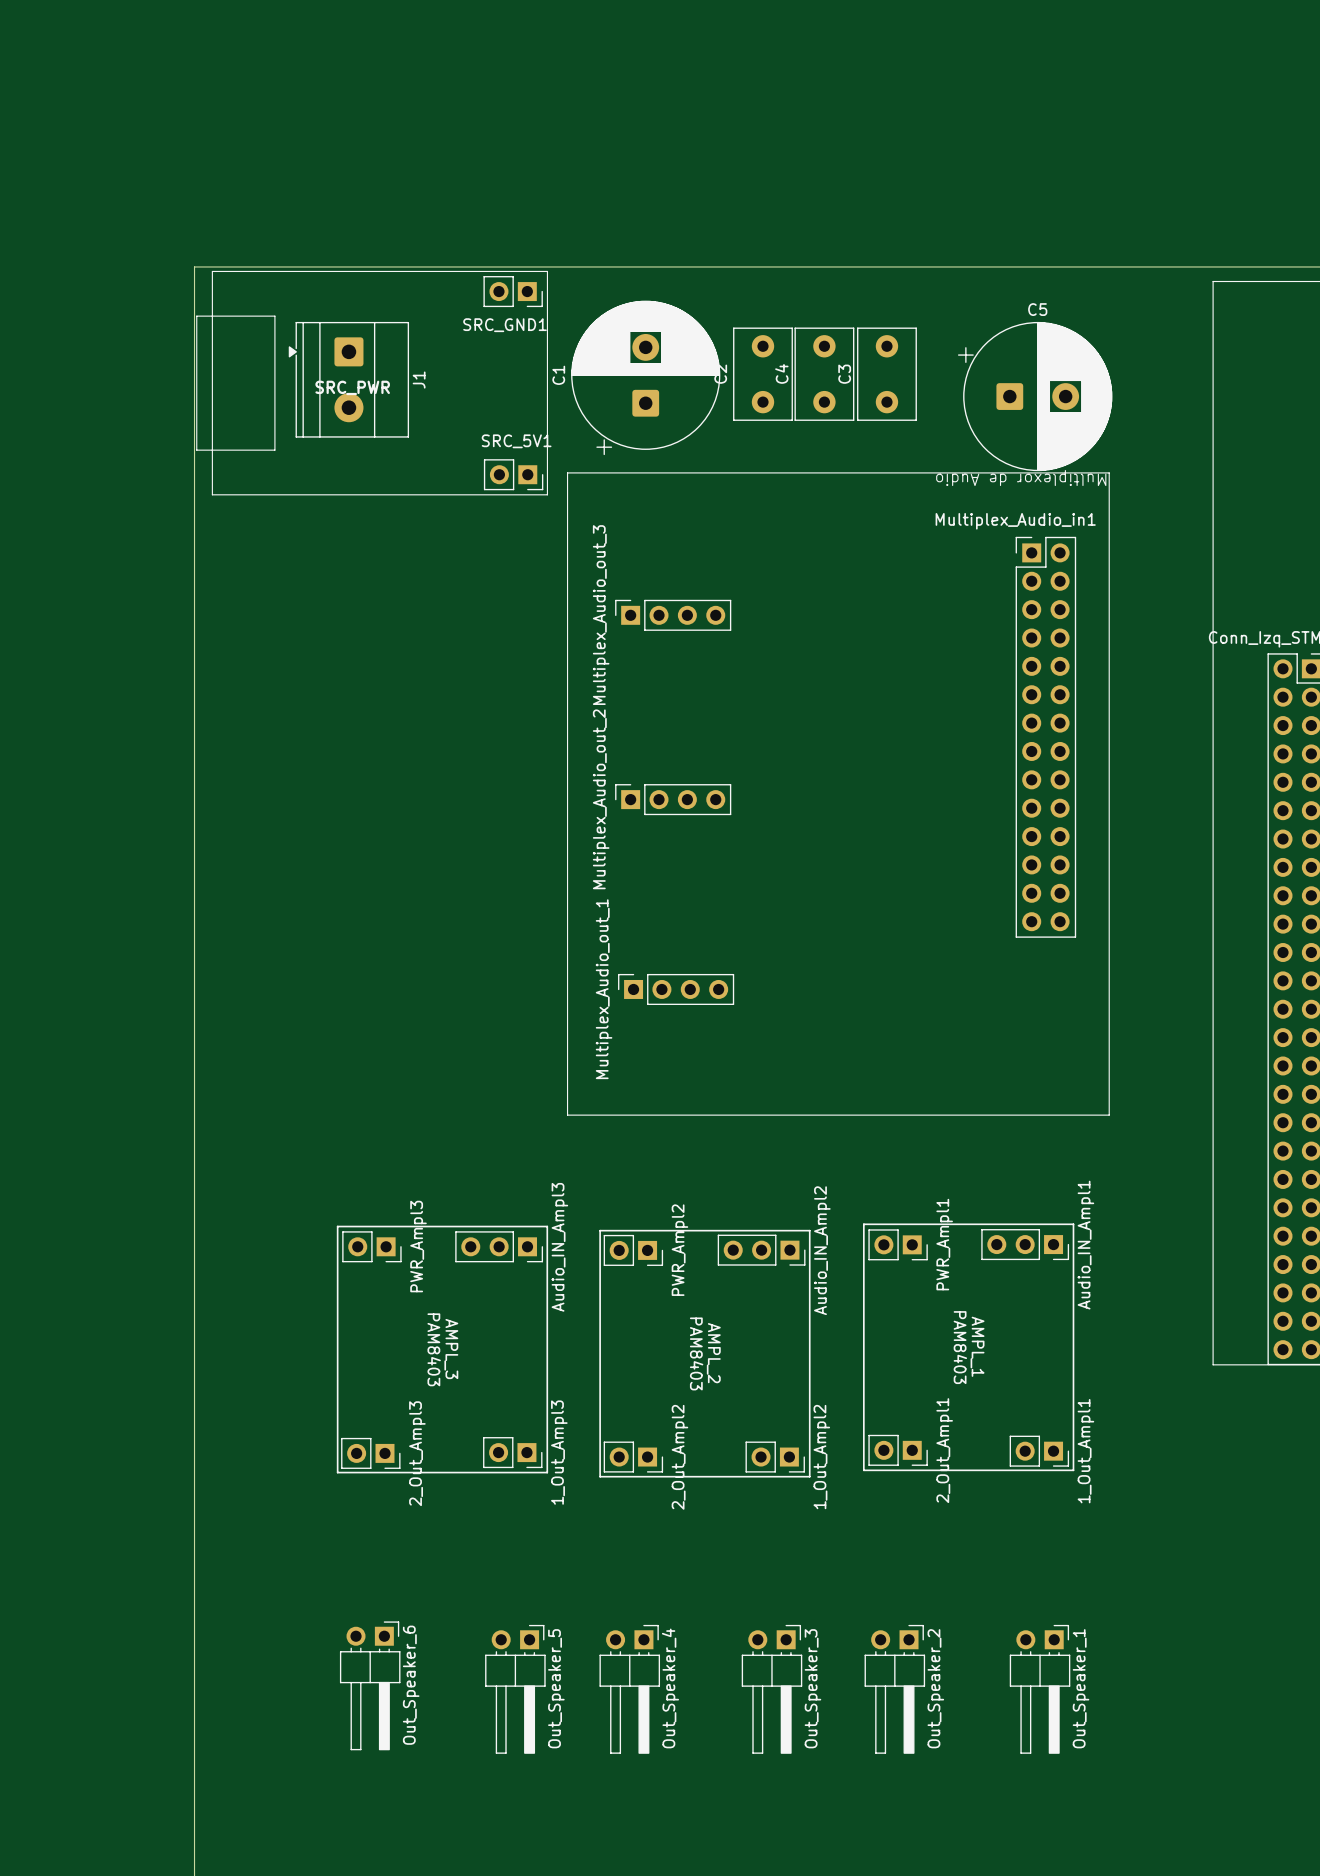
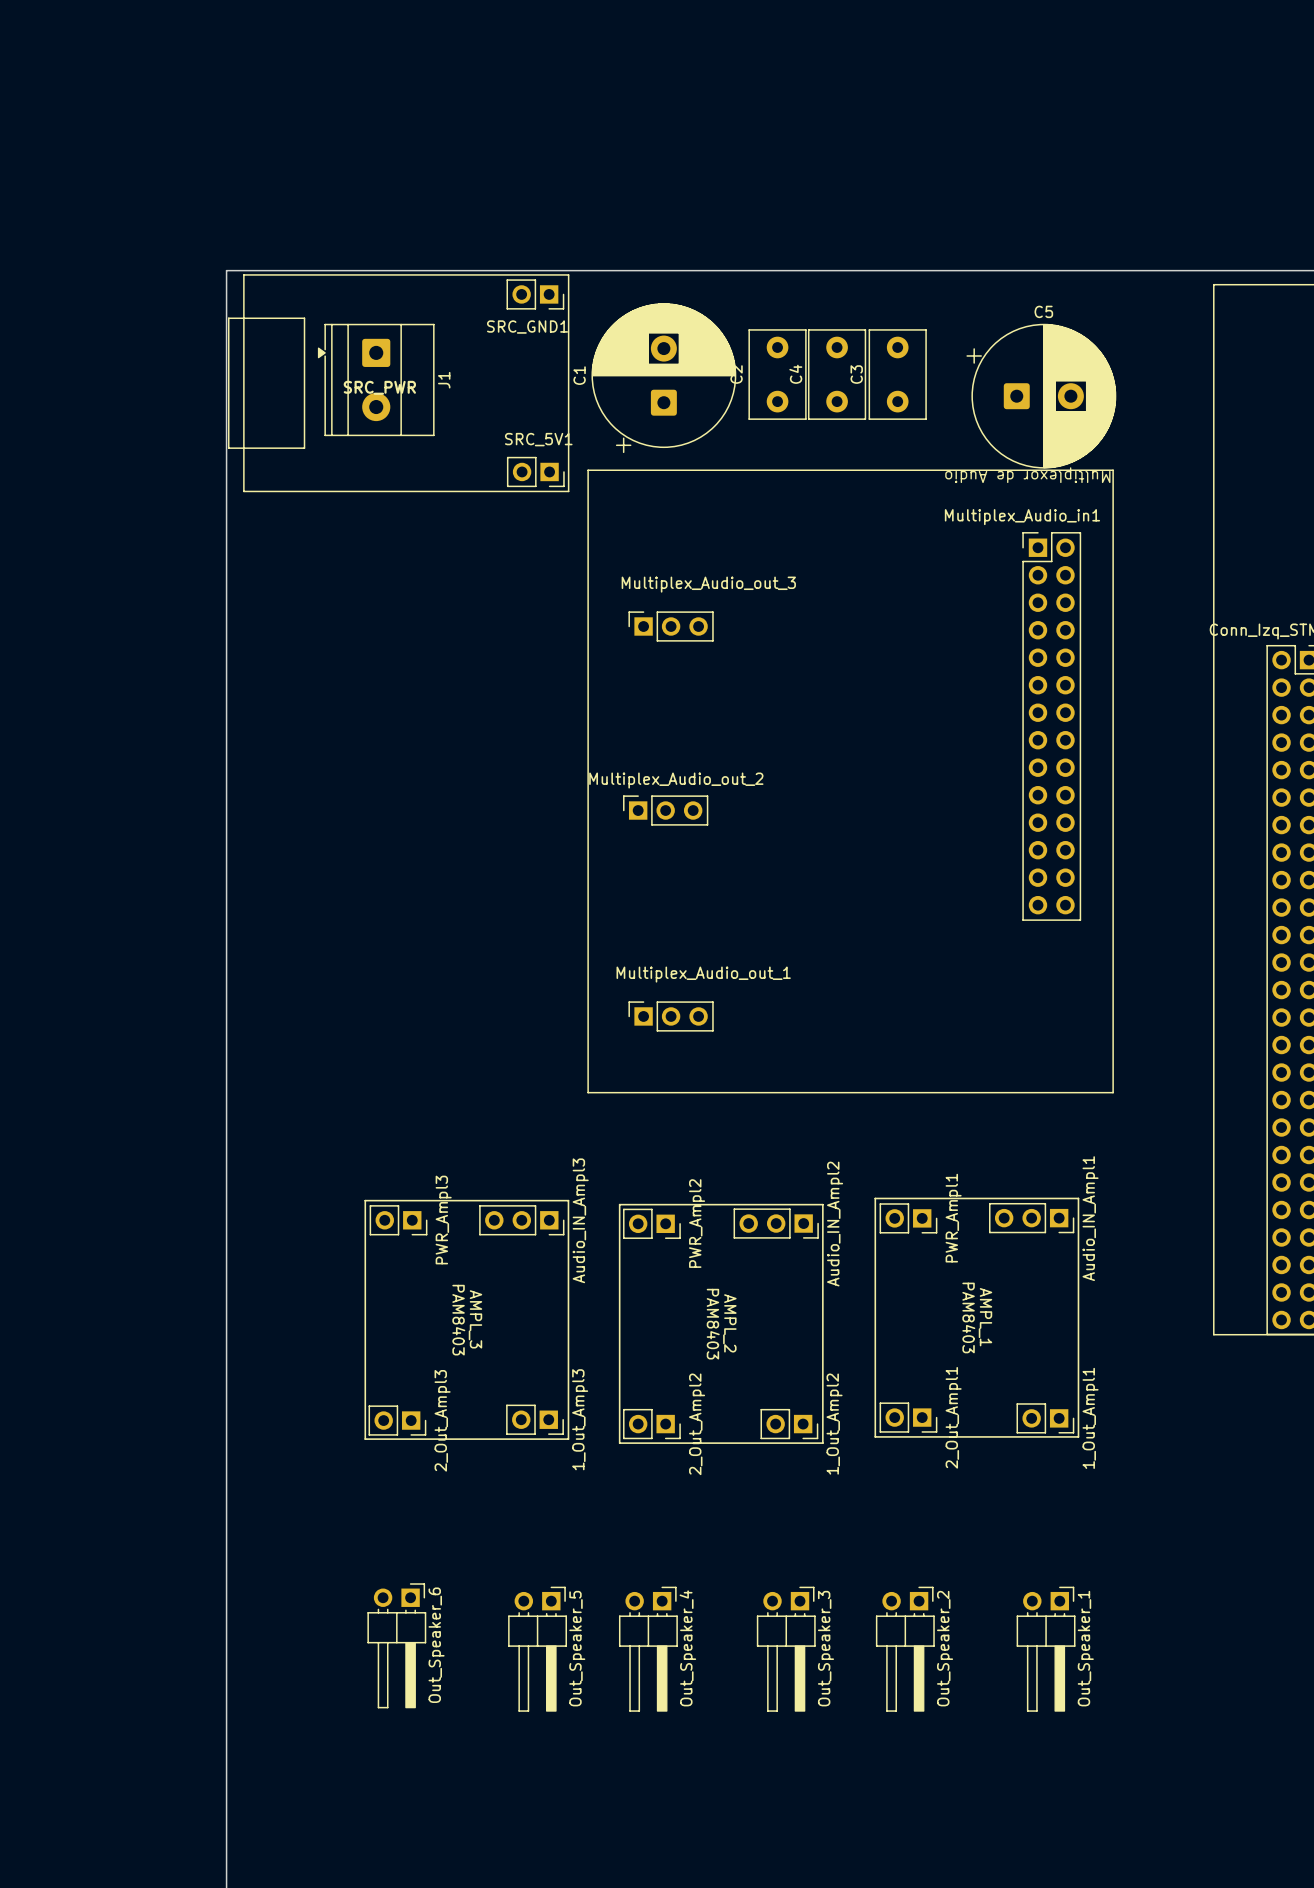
Multiplex_Audio_out_3 footprint: [615, 599, 732, 631] -> [628, 611, 714, 642]
Multiplex_Audio_out_3 name position: Multiplex_Audio_out_3 (601, 615) -> Multiplex_Audio_out_3 (708, 584)
Multiplex_Audio_out_2 footprint: [615, 784, 732, 816] -> [623, 795, 709, 826]
Multiplex_Audio_out_2 name position: Multiplex_Audio_out_2 (601, 799) -> Multiplex_Audio_out_2 (676, 780)
Multiplex_Audio_out_1 footprint: [618, 973, 735, 1006] -> [628, 1001, 714, 1032]
Multiplex_Audio_out_1 name position: Multiplex_Audio_out_1 (604, 989) -> Multiplex_Audio_out_1 (703, 974)

